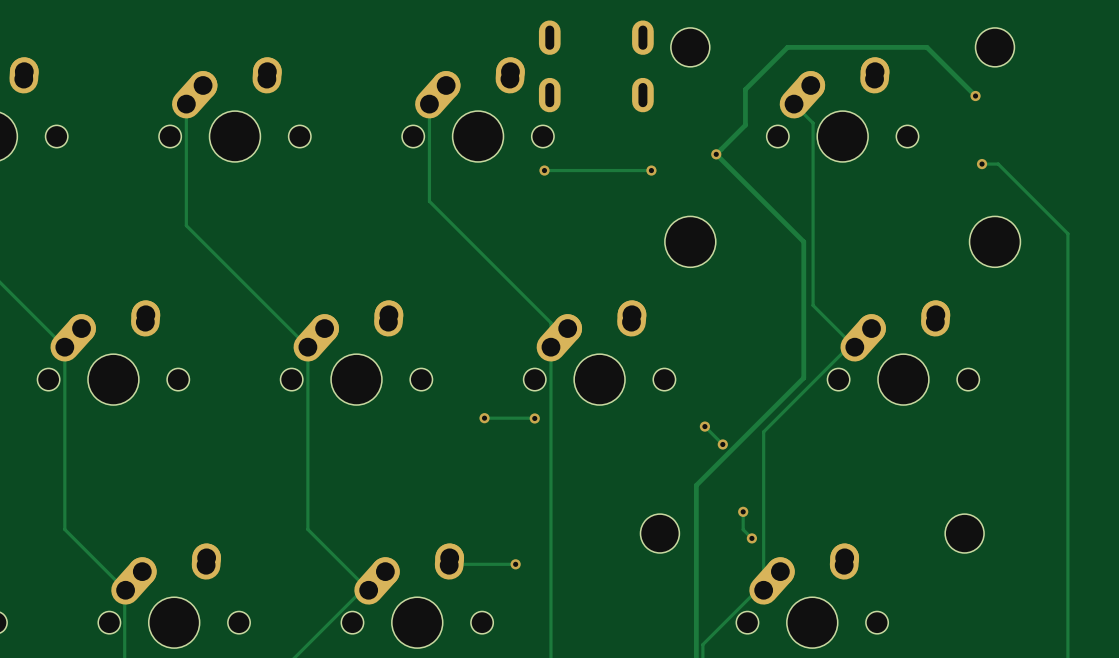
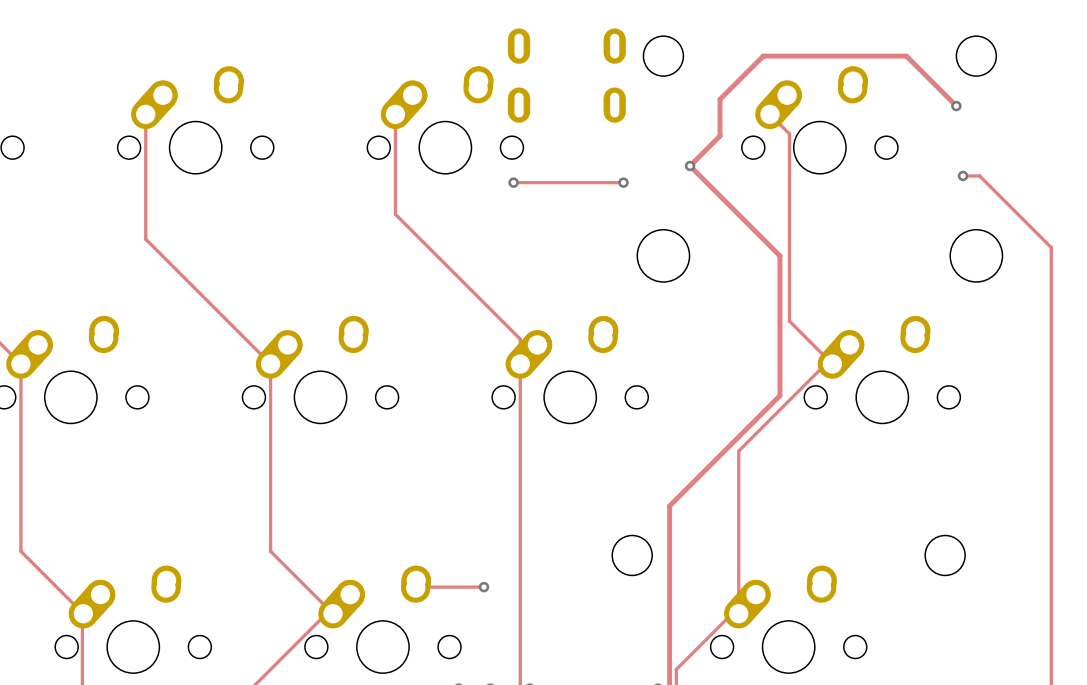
track: (484, 418) (534, 418) -> none
via: (484, 418) -> none
via: (534, 418) -> none
track: (704, 426) (722, 444) -> none
via: (704, 426) -> none
via: (722, 444) -> none
track: (743, 511) (743, 529) (751, 538) -> none
via: (743, 511) -> none
via: (751, 538) -> none

